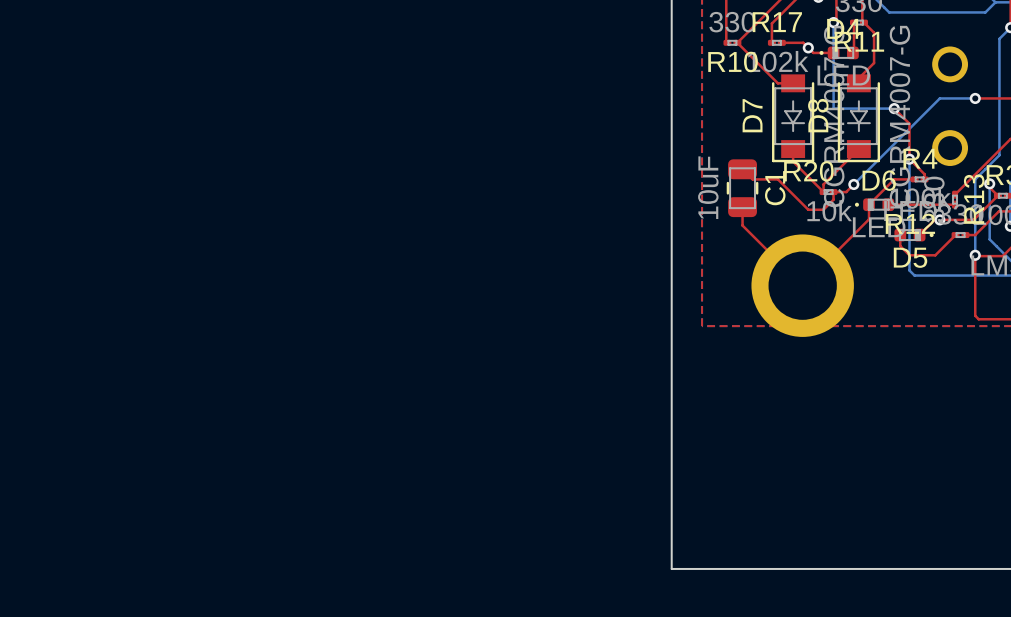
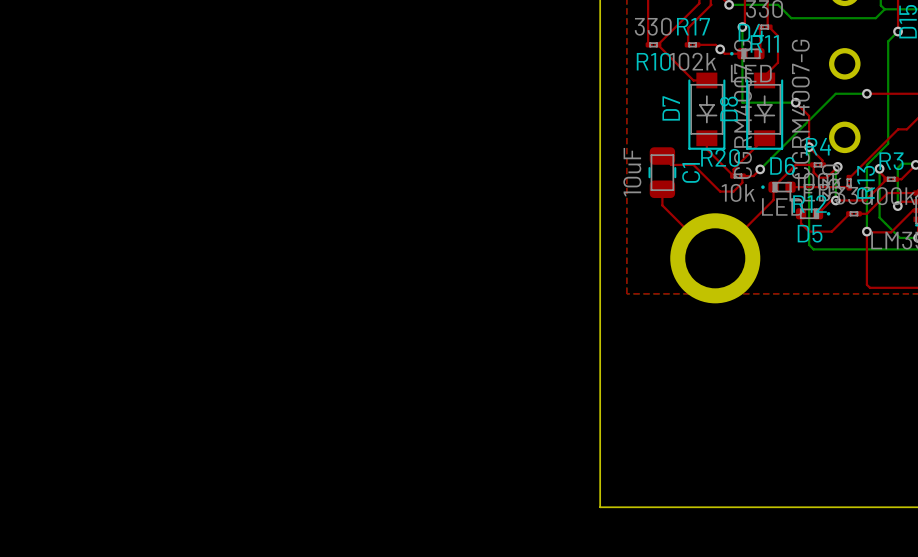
top track: none -> (813, 164) (813, 172) (819, 177) (826, 177) (837, 166)
bottom track: none -> (837, 166) (835, 168) (835, 200)
via: none -> (837, 166)

